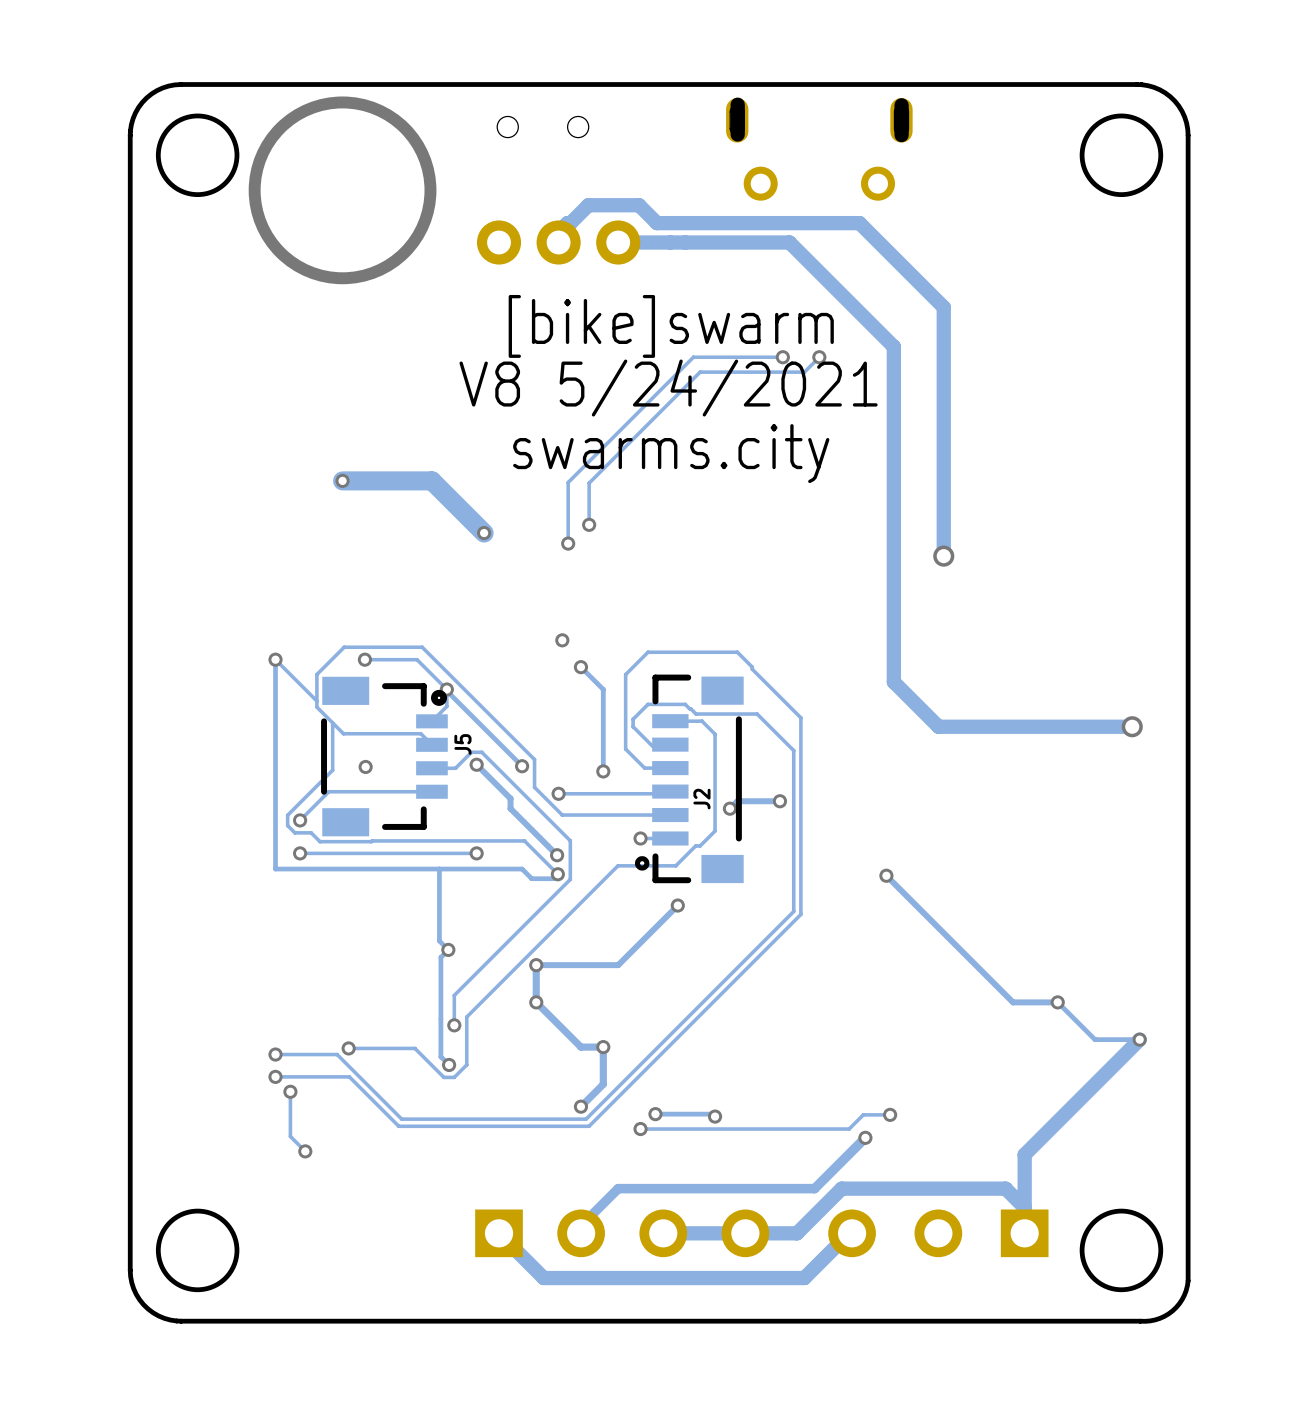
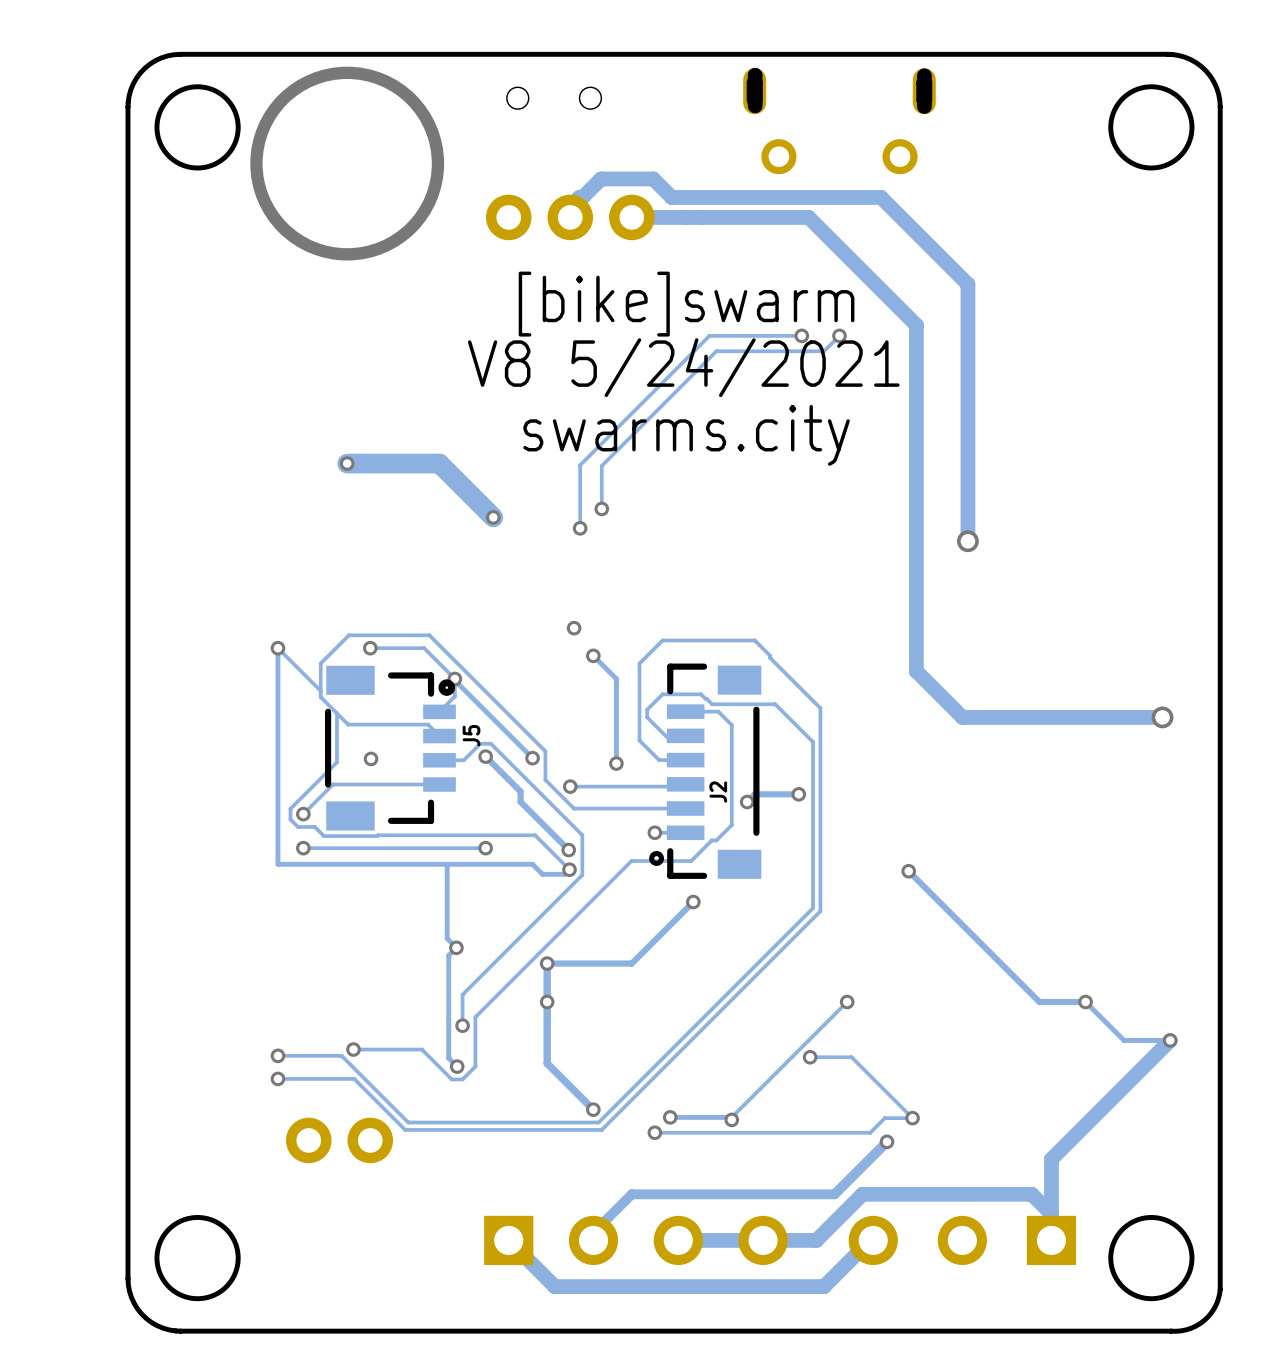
track: (536, 1002) (580, 1047) (603, 1047) (603, 1084) (580, 1106) -> (547, 1002) (547, 1063) (593, 1109)
track: none -> (847, 1002) (731, 1117) (729, 1117)
via: none -> (847, 1002)
via: (603, 1047) -> none
track: none -> (810, 1057) (851, 1057) (912, 1118)
via: none -> (810, 1057)
track: (290, 1091) (290, 1136) (305, 1151) -> none
via: (290, 1091) -> none
part: none -> (339, 1140)
via: (305, 1151) -> none

